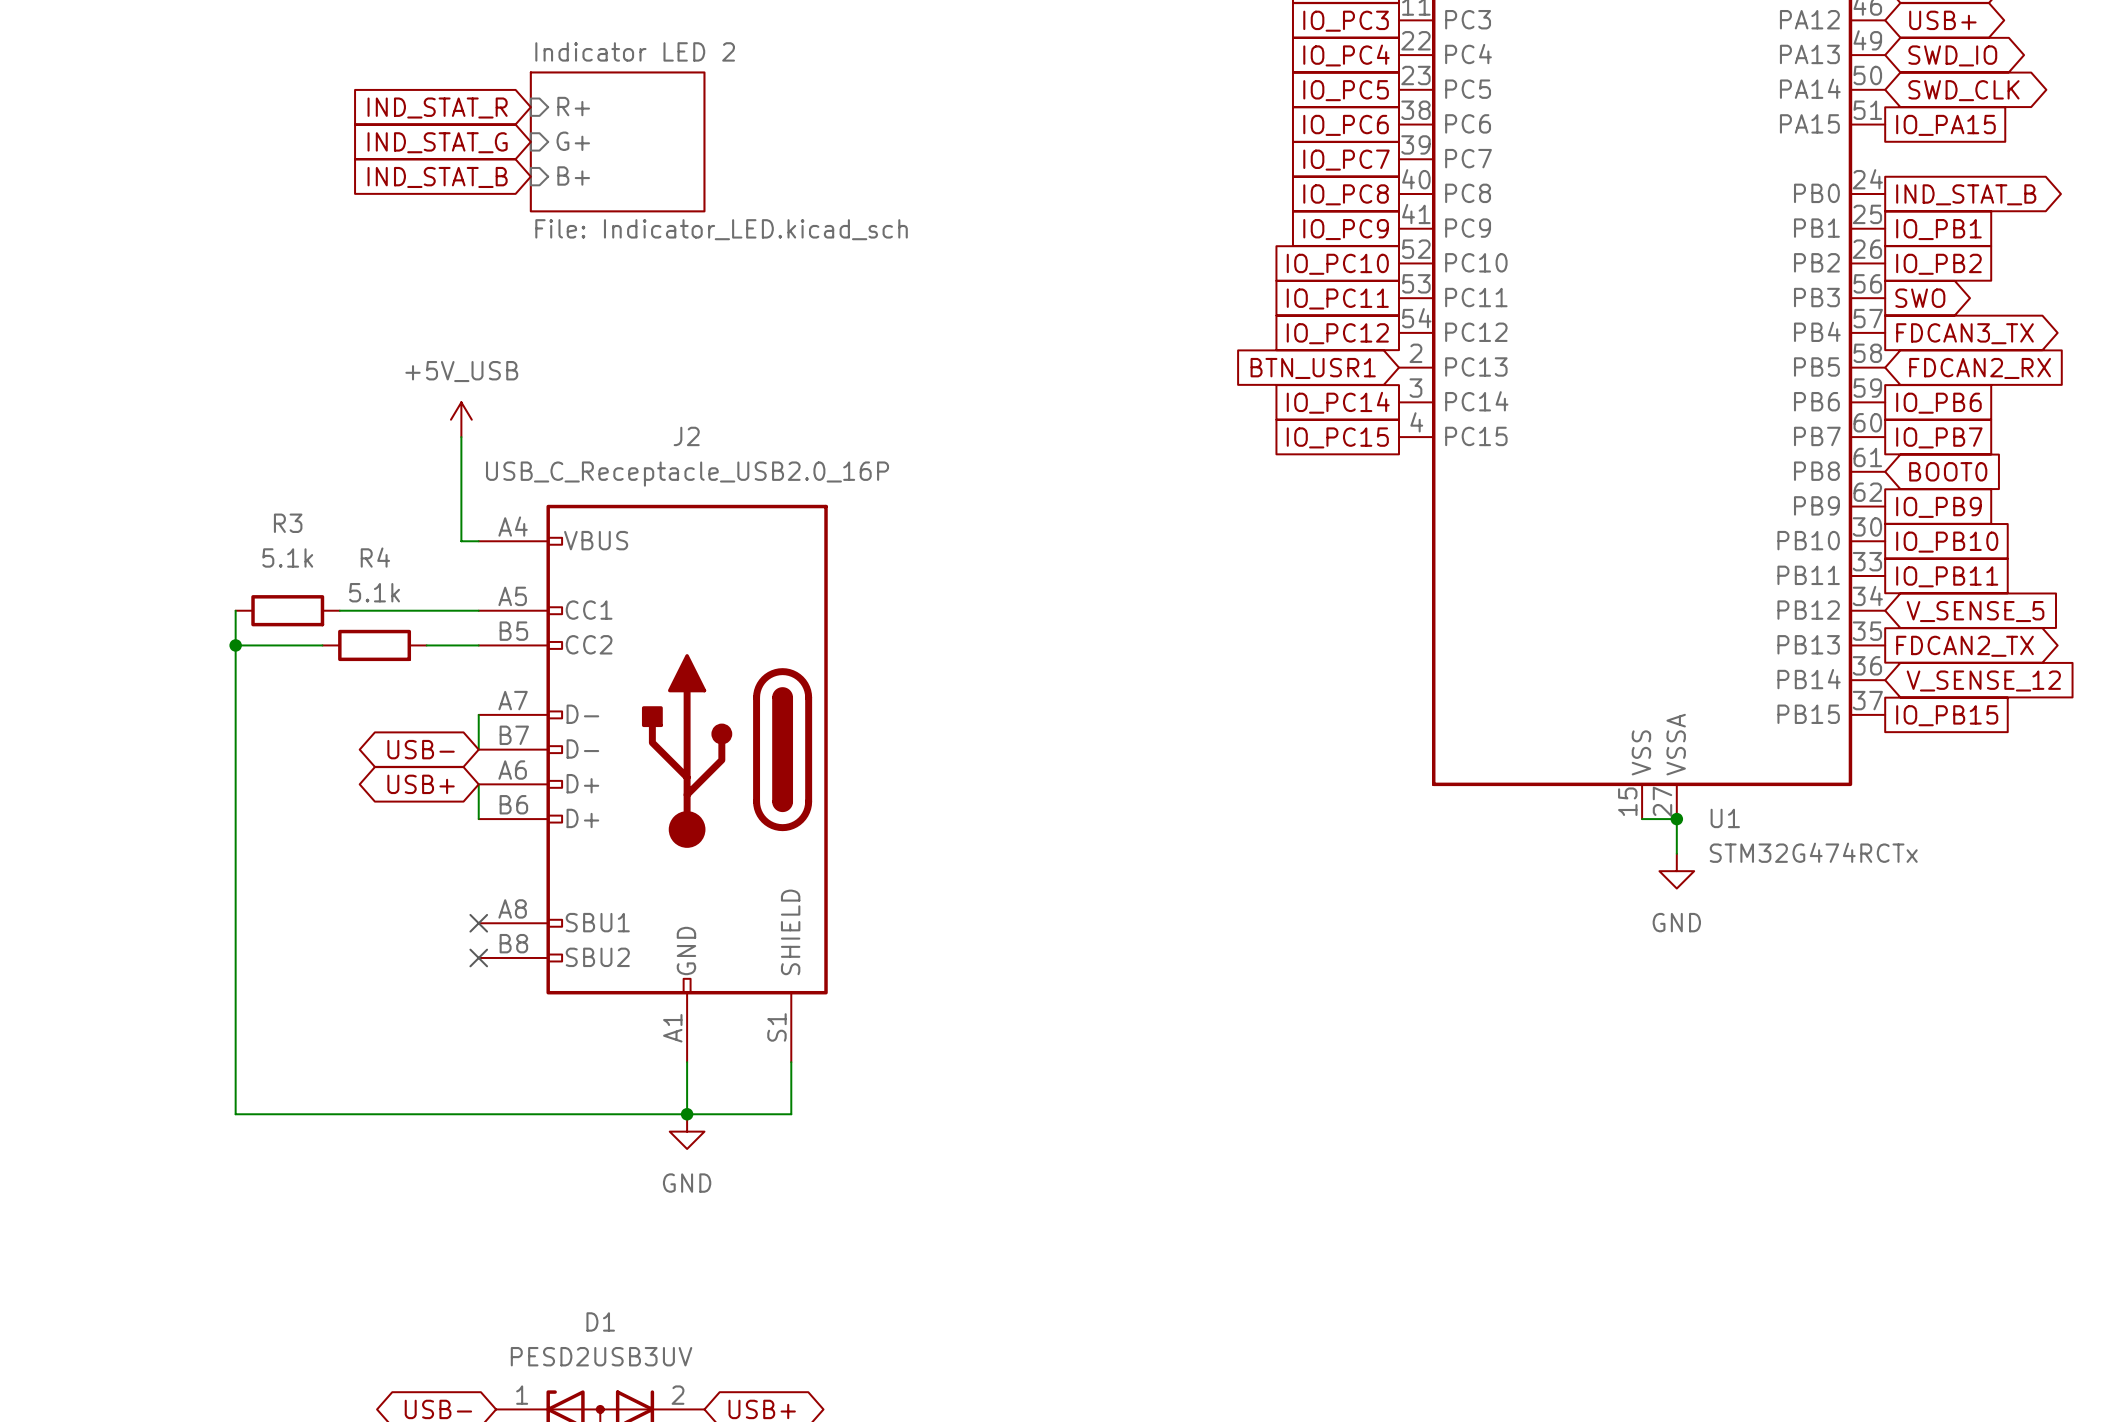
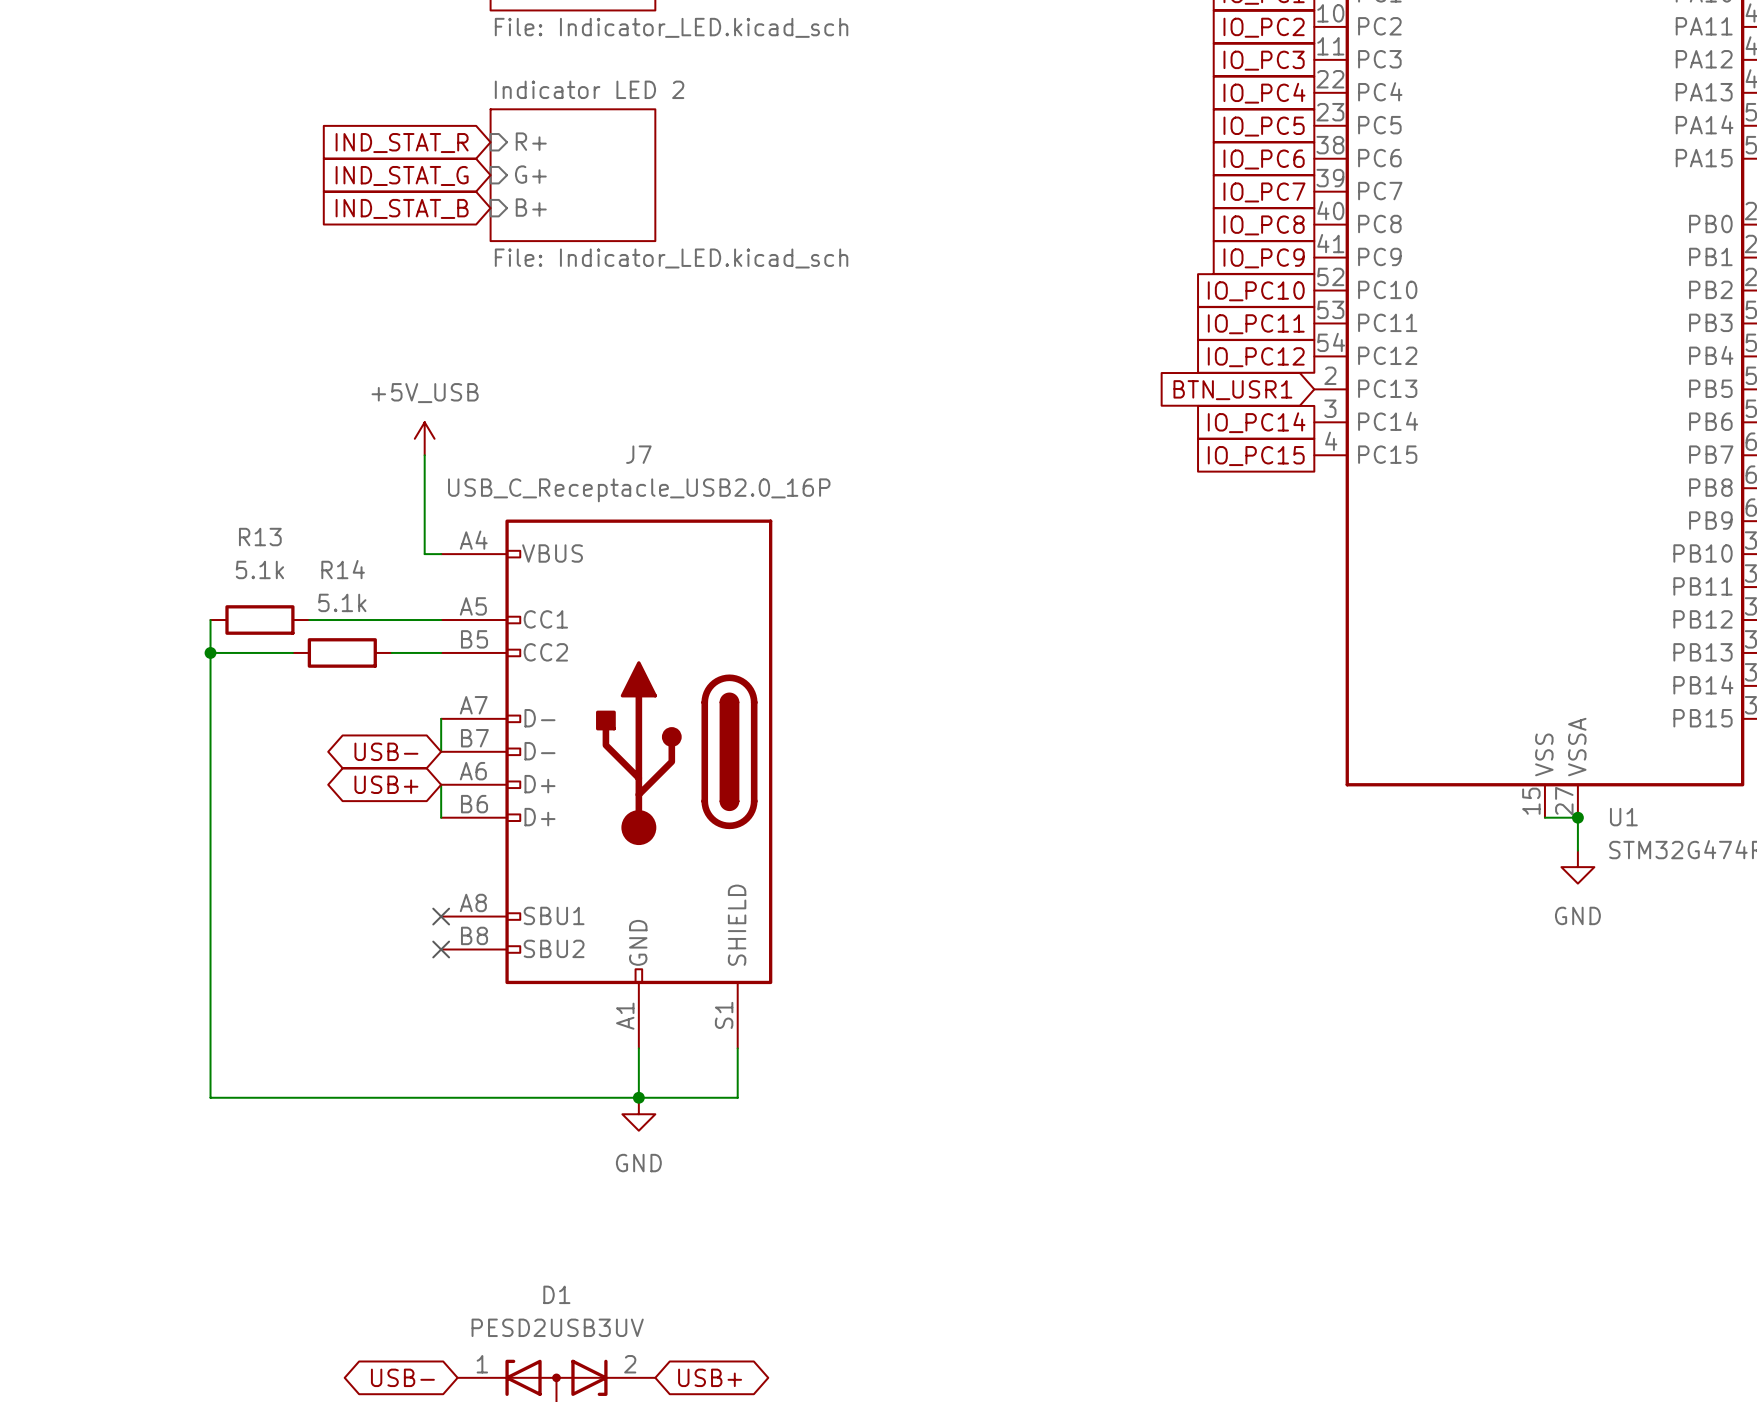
J2 name: J2 (686, 436) -> J7 (638, 454)
R3 name: R3 (288, 523) -> R13 (260, 537)
R4 name: R4 (375, 557) -> R14 (343, 569)

